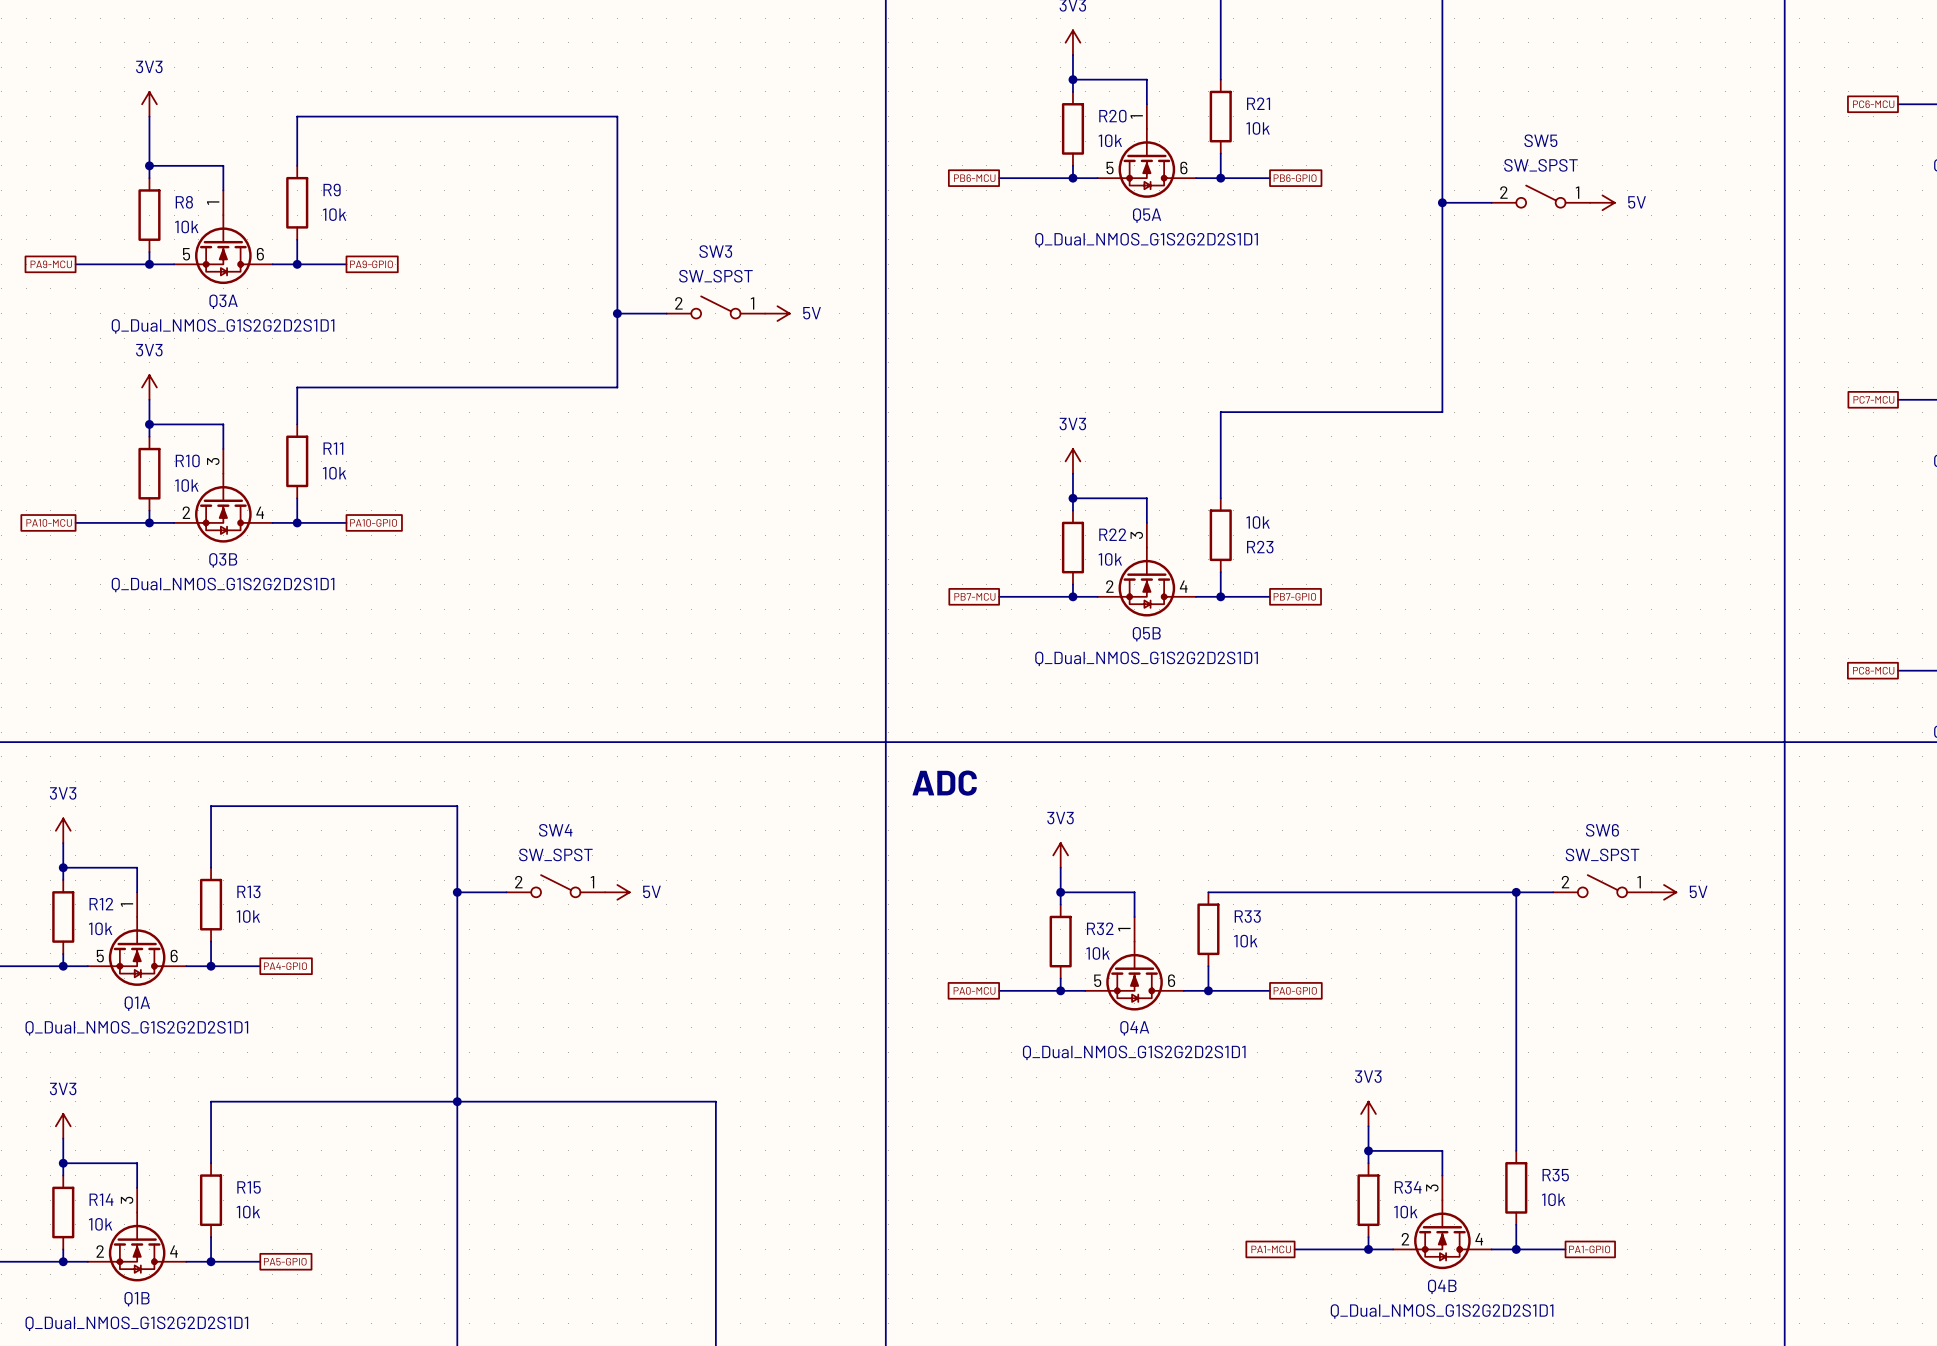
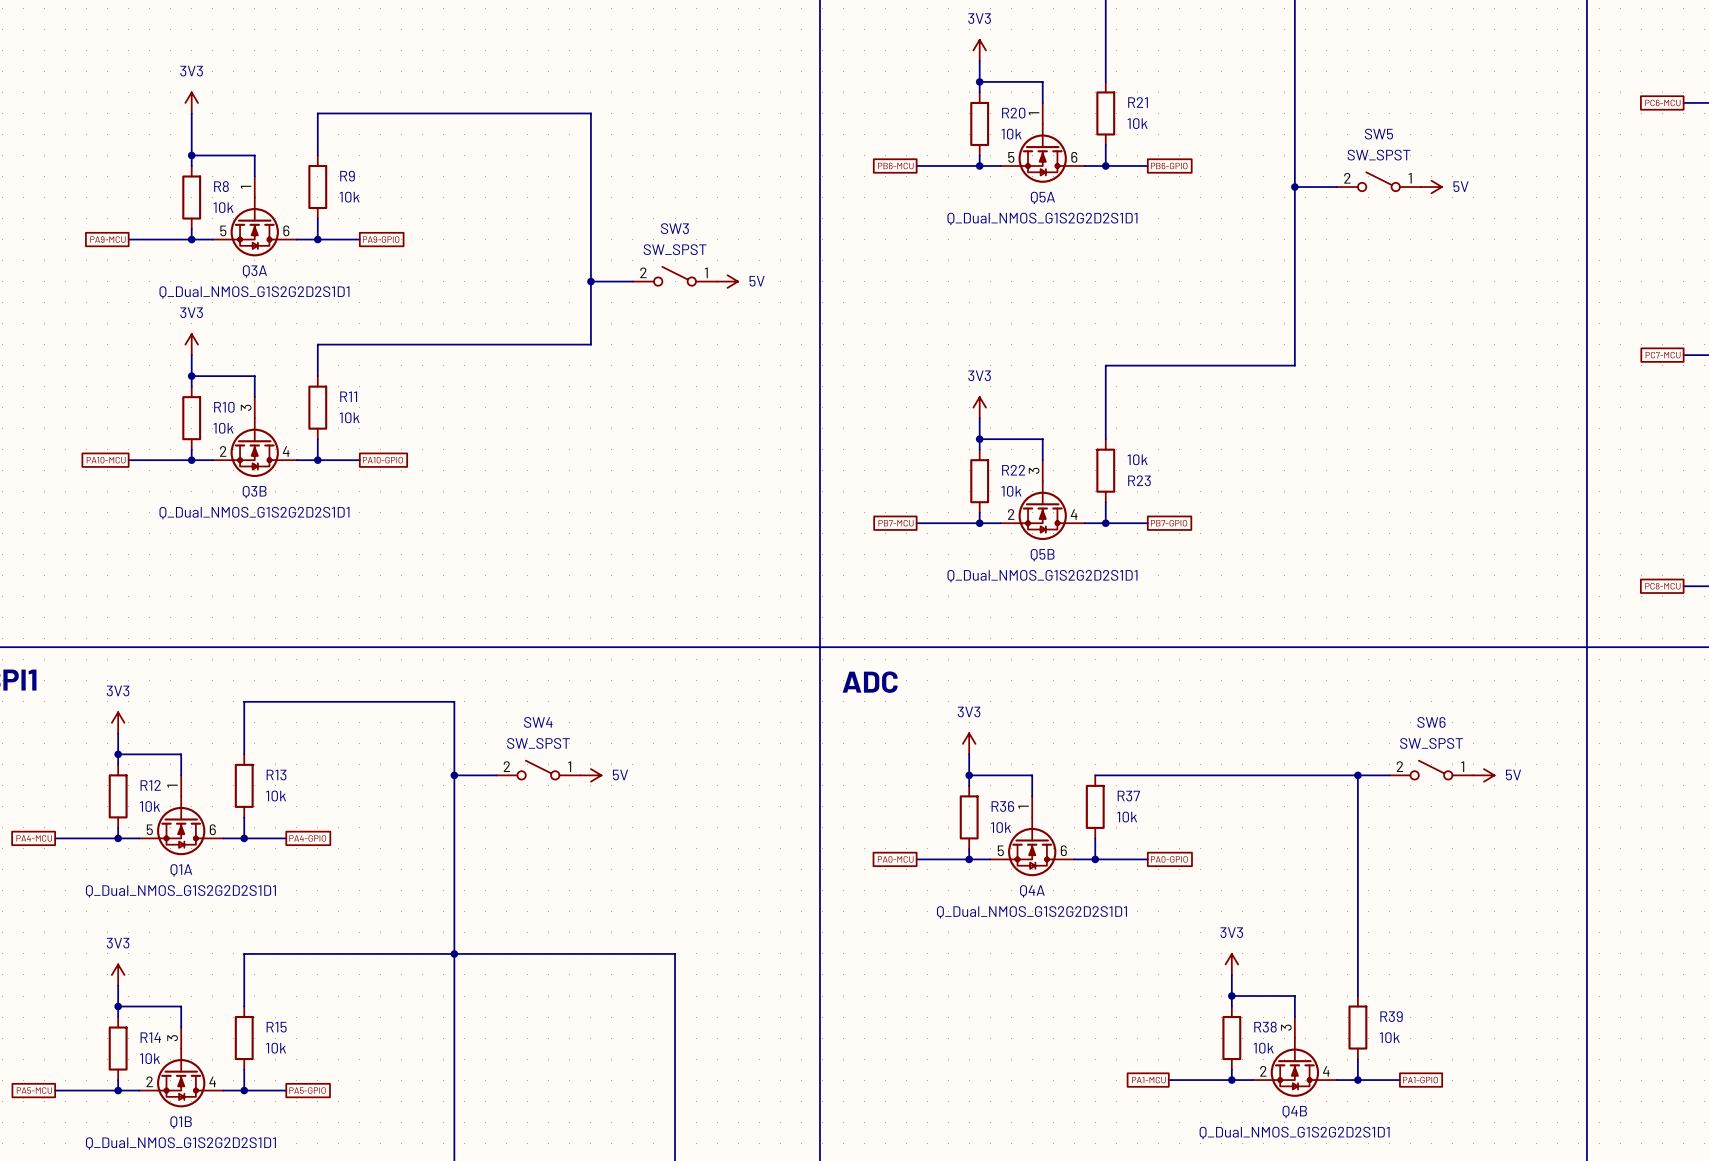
R33 name: R33 (1247, 916) -> R37 (1128, 796)
R32 name: R32 (1100, 928) -> R36 (1002, 806)
R35 name: R35 (1555, 1175) -> R39 (1391, 1016)
R34 name: R34 (1408, 1187) -> R38 (1265, 1027)

